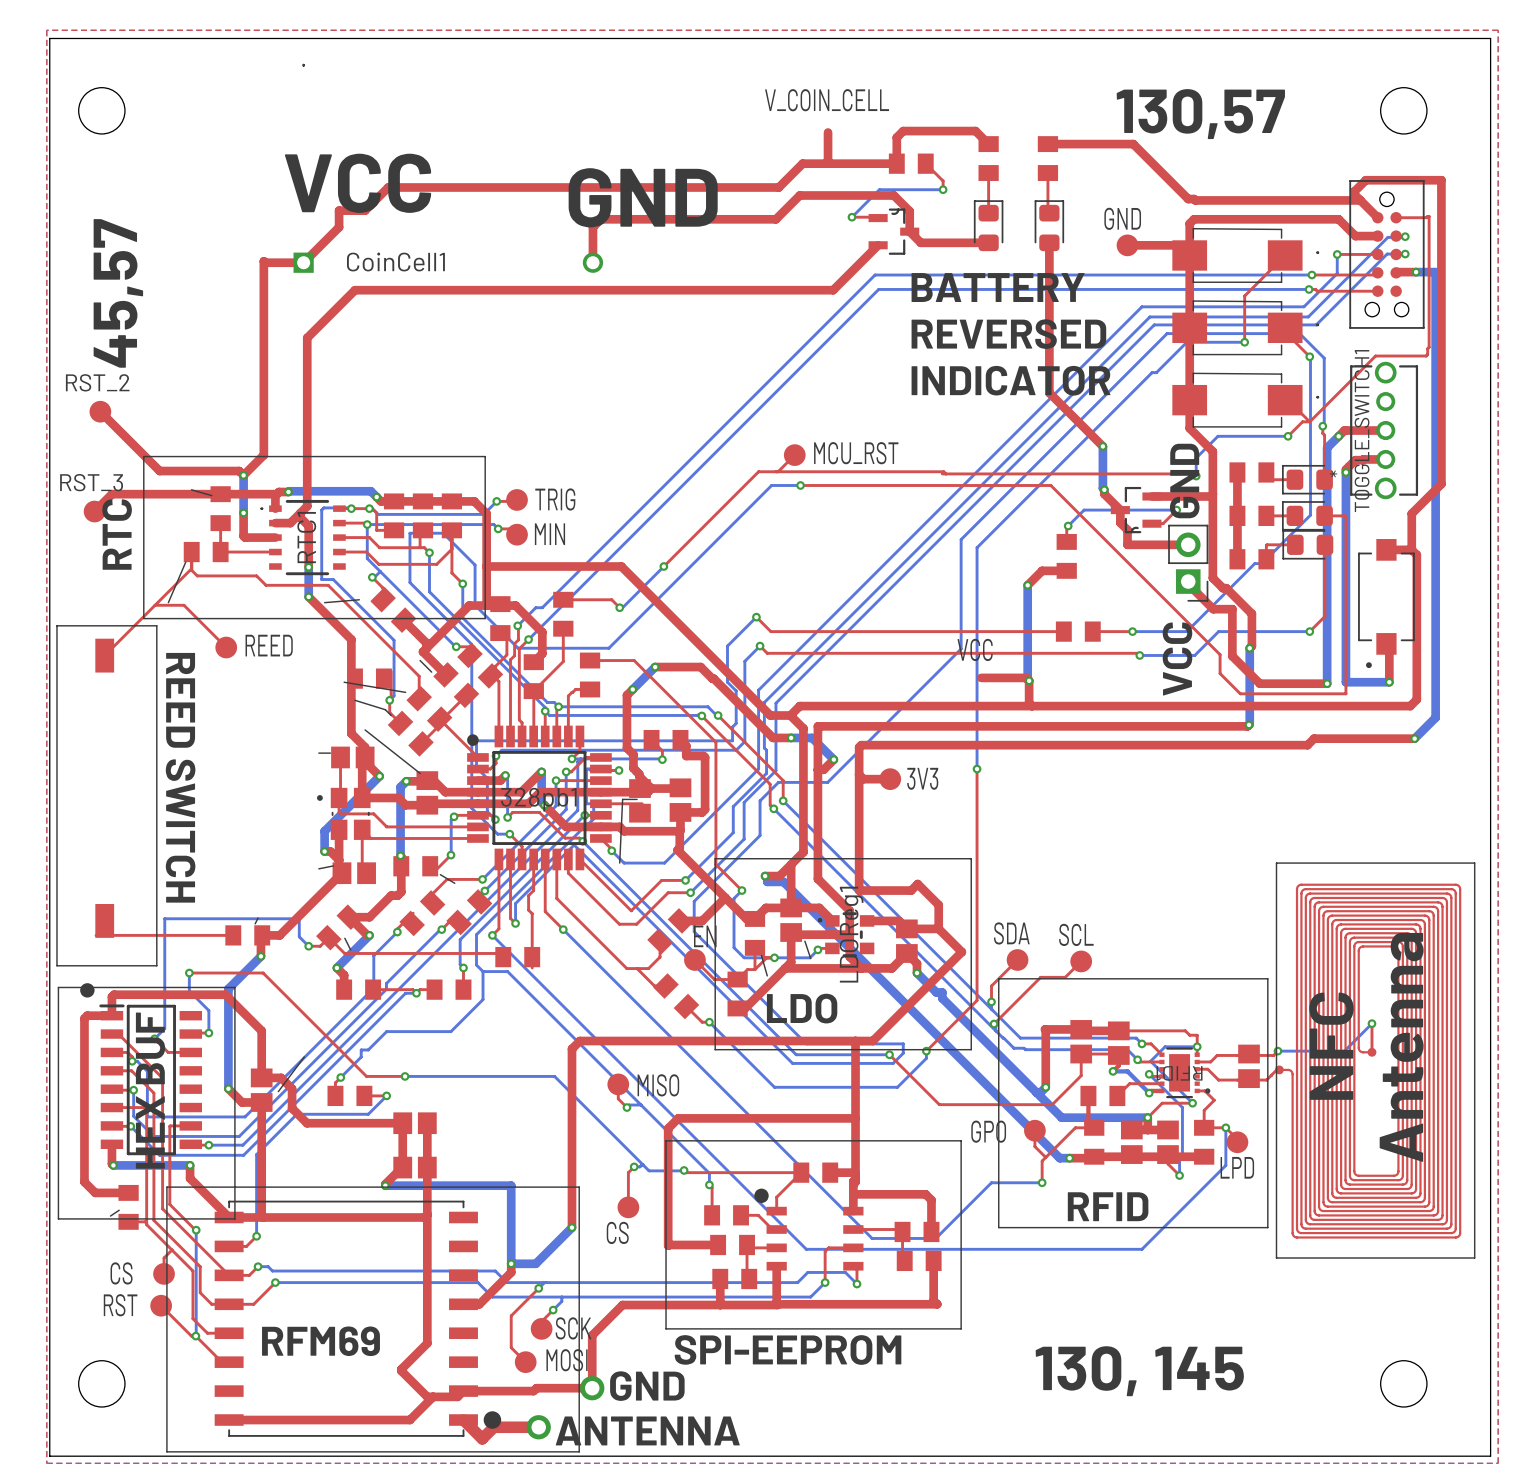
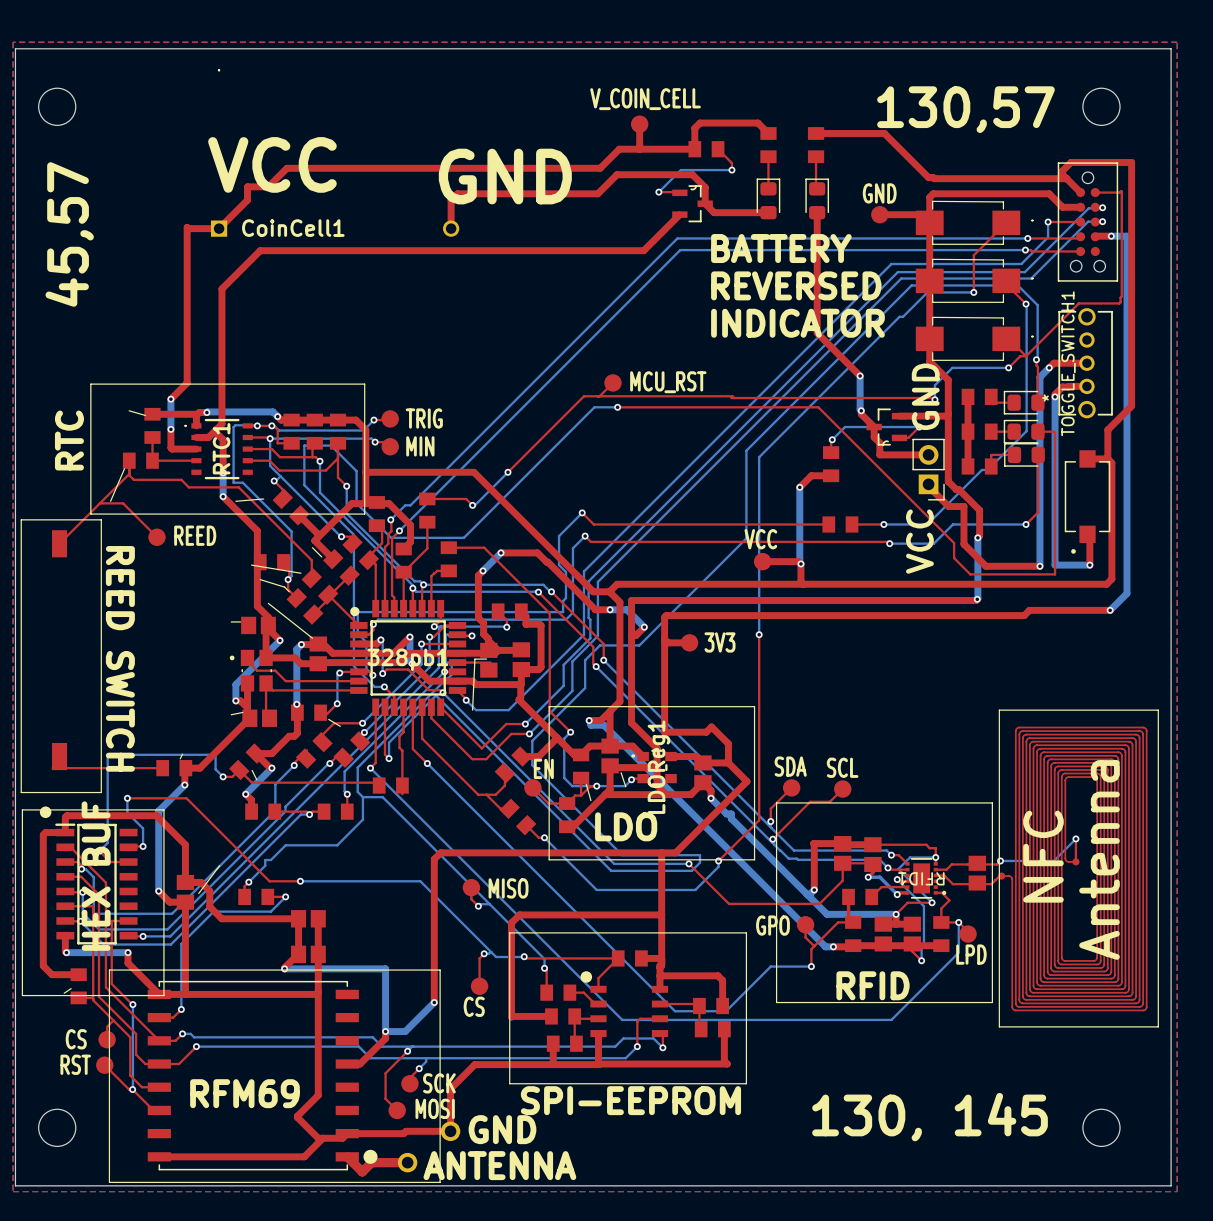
part: none -> (639, 124)
top track: (100, 411) (159, 471) (239, 471) (243, 475) -> none
RST_2: (100, 411) -> none
top track: (220, 494) (111, 494) (94, 511) -> none
RST_3: (94, 511) -> none
part: none -> (762, 561)
top track: (340, 757) (339, 812) (351, 813) -> (247, 661) (257, 670)

